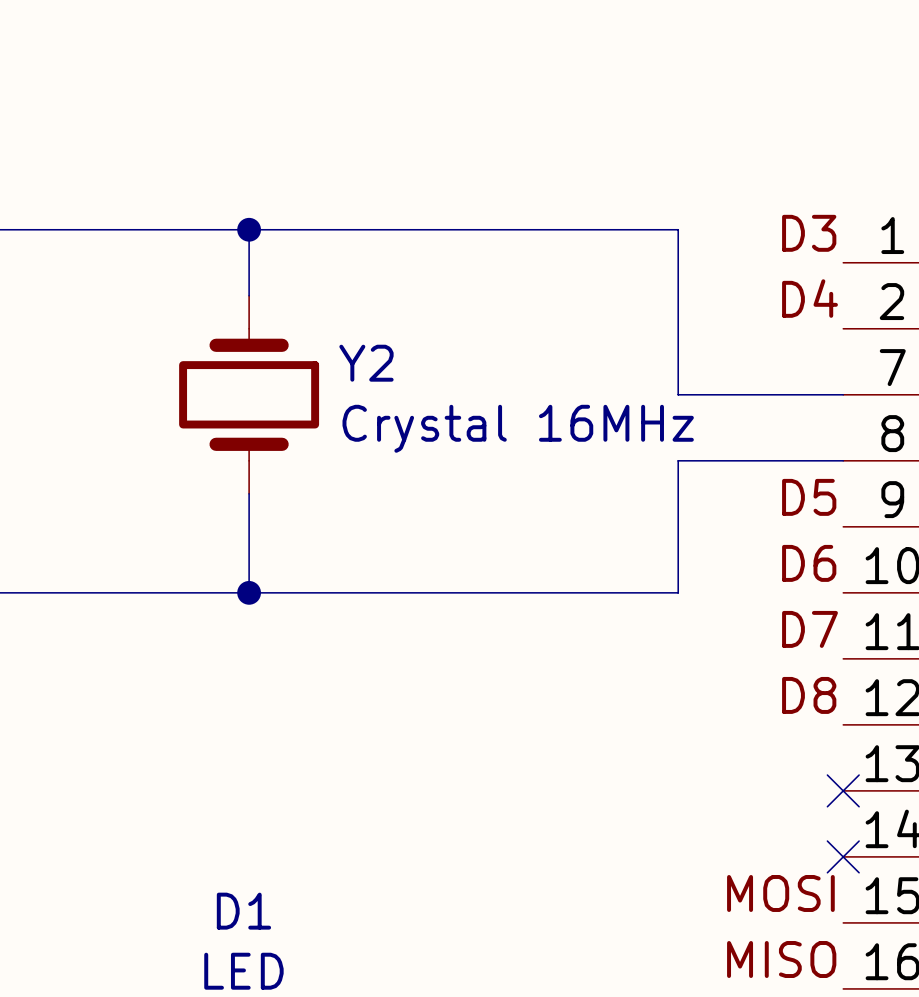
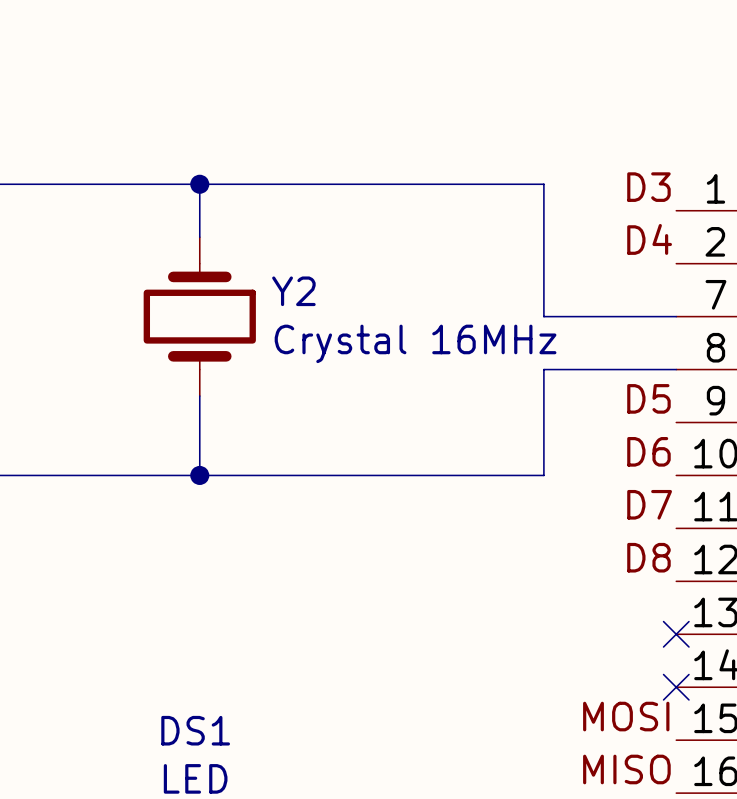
D1 name: D1 (243, 911) -> DS1 (195, 730)

